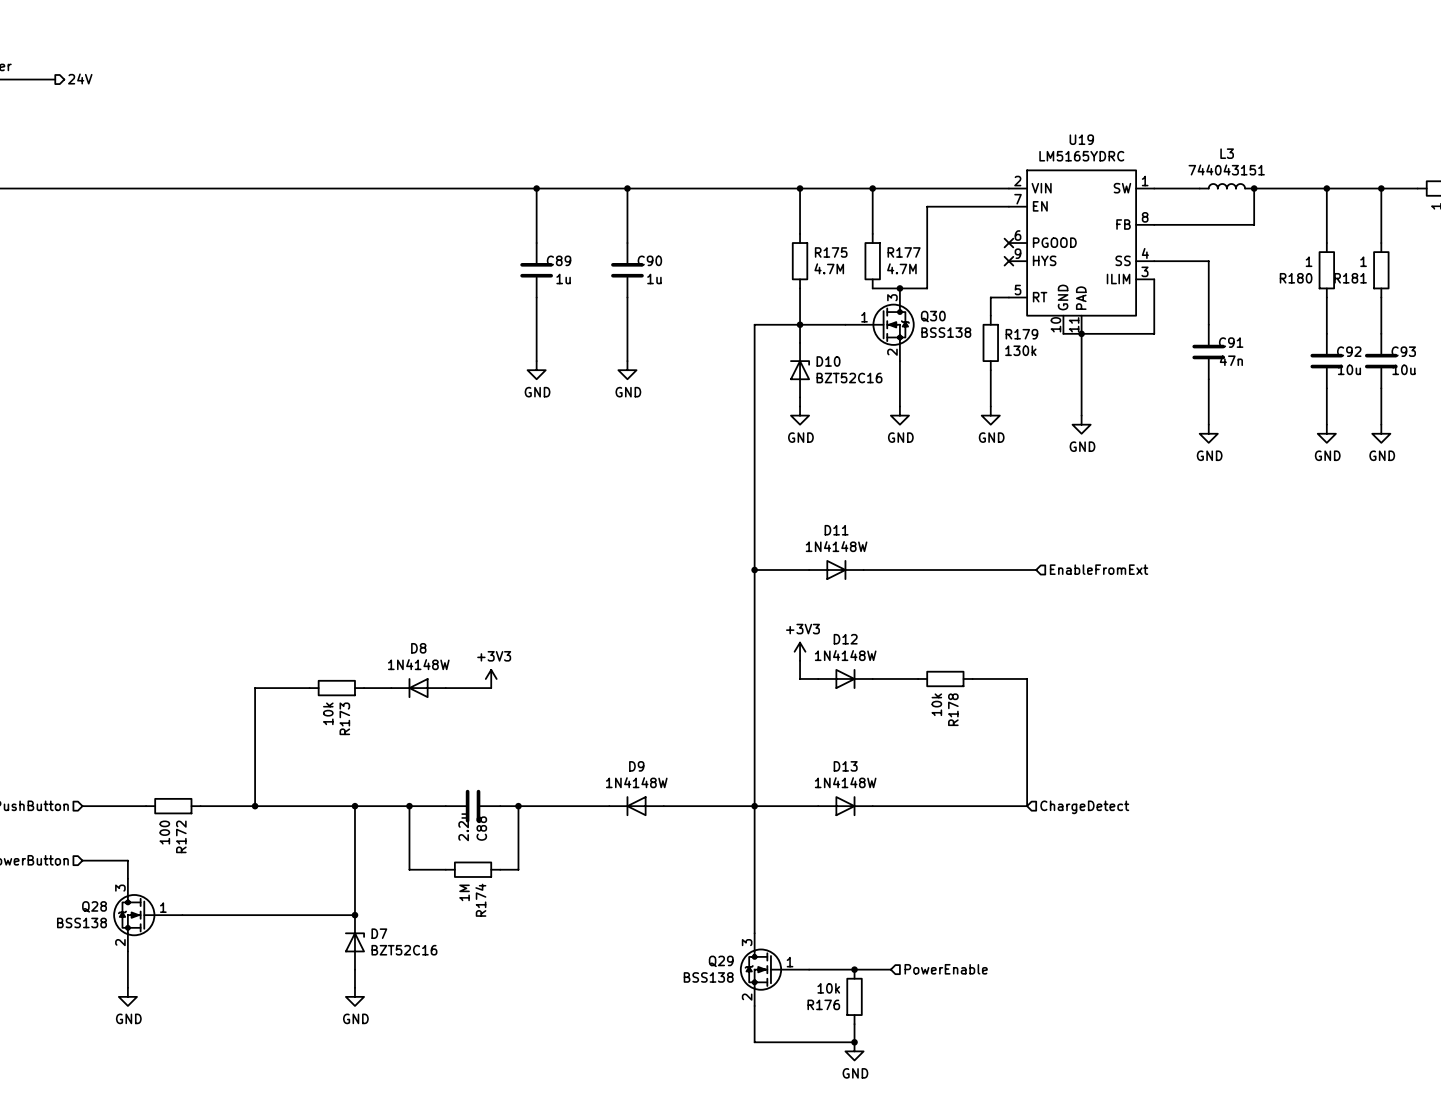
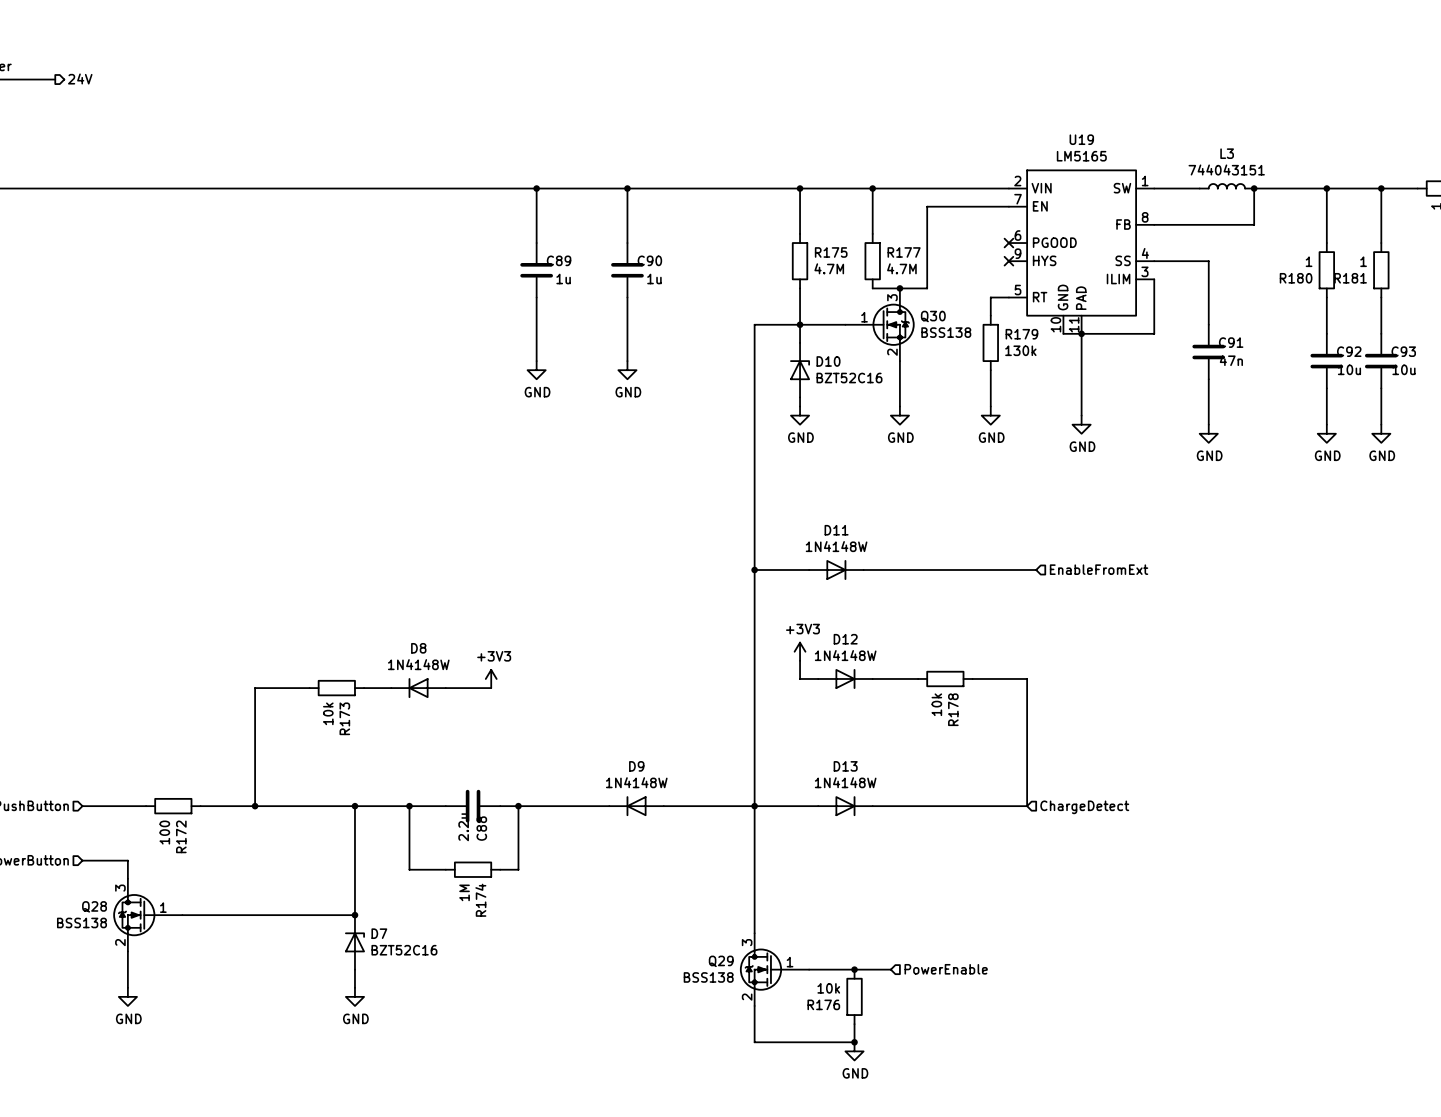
U19 value: LM5165YDRC (1081, 156) -> LM5165 (1081, 156)

